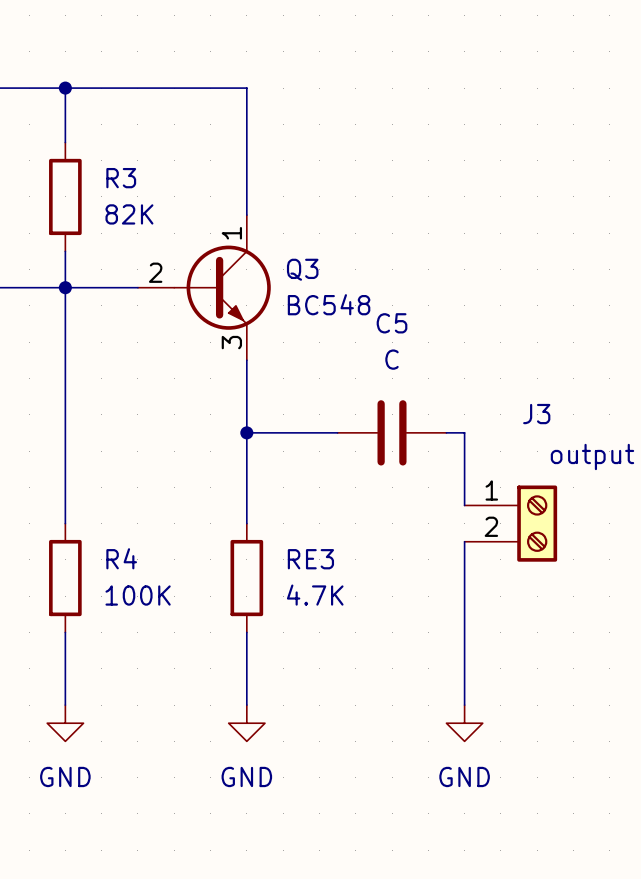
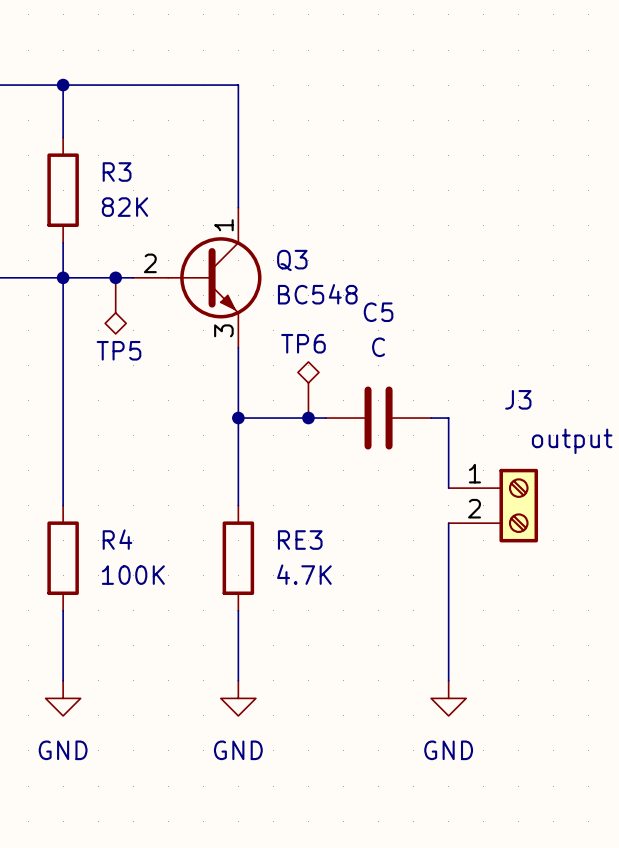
junction: none -> (115, 277)
TP5: none -> (115, 305)
TP6: none -> (308, 389)
junction: none -> (308, 418)

